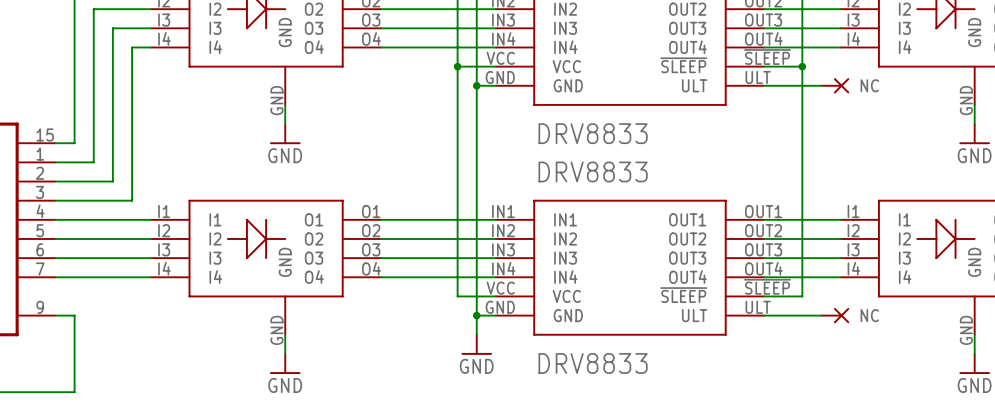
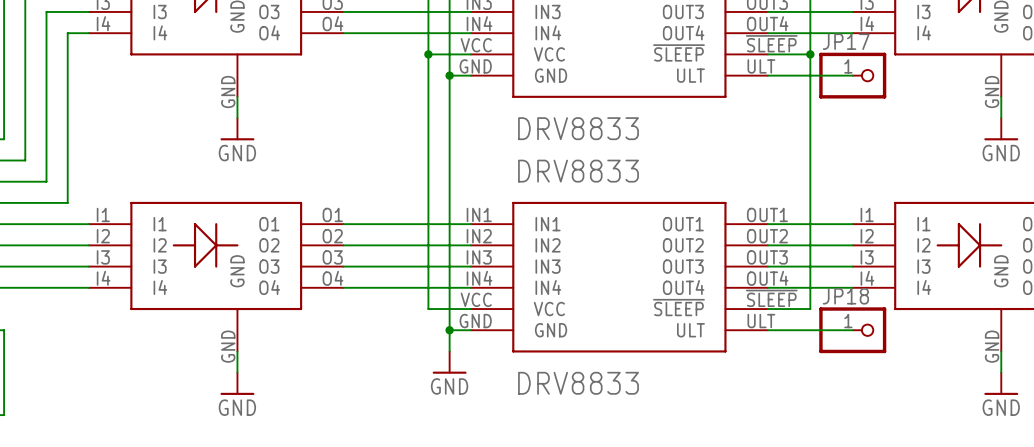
part: (835, 85) -> none
JP17: none -> (852, 75)
part: (835, 315) -> none
JP18: none -> (852, 330)

